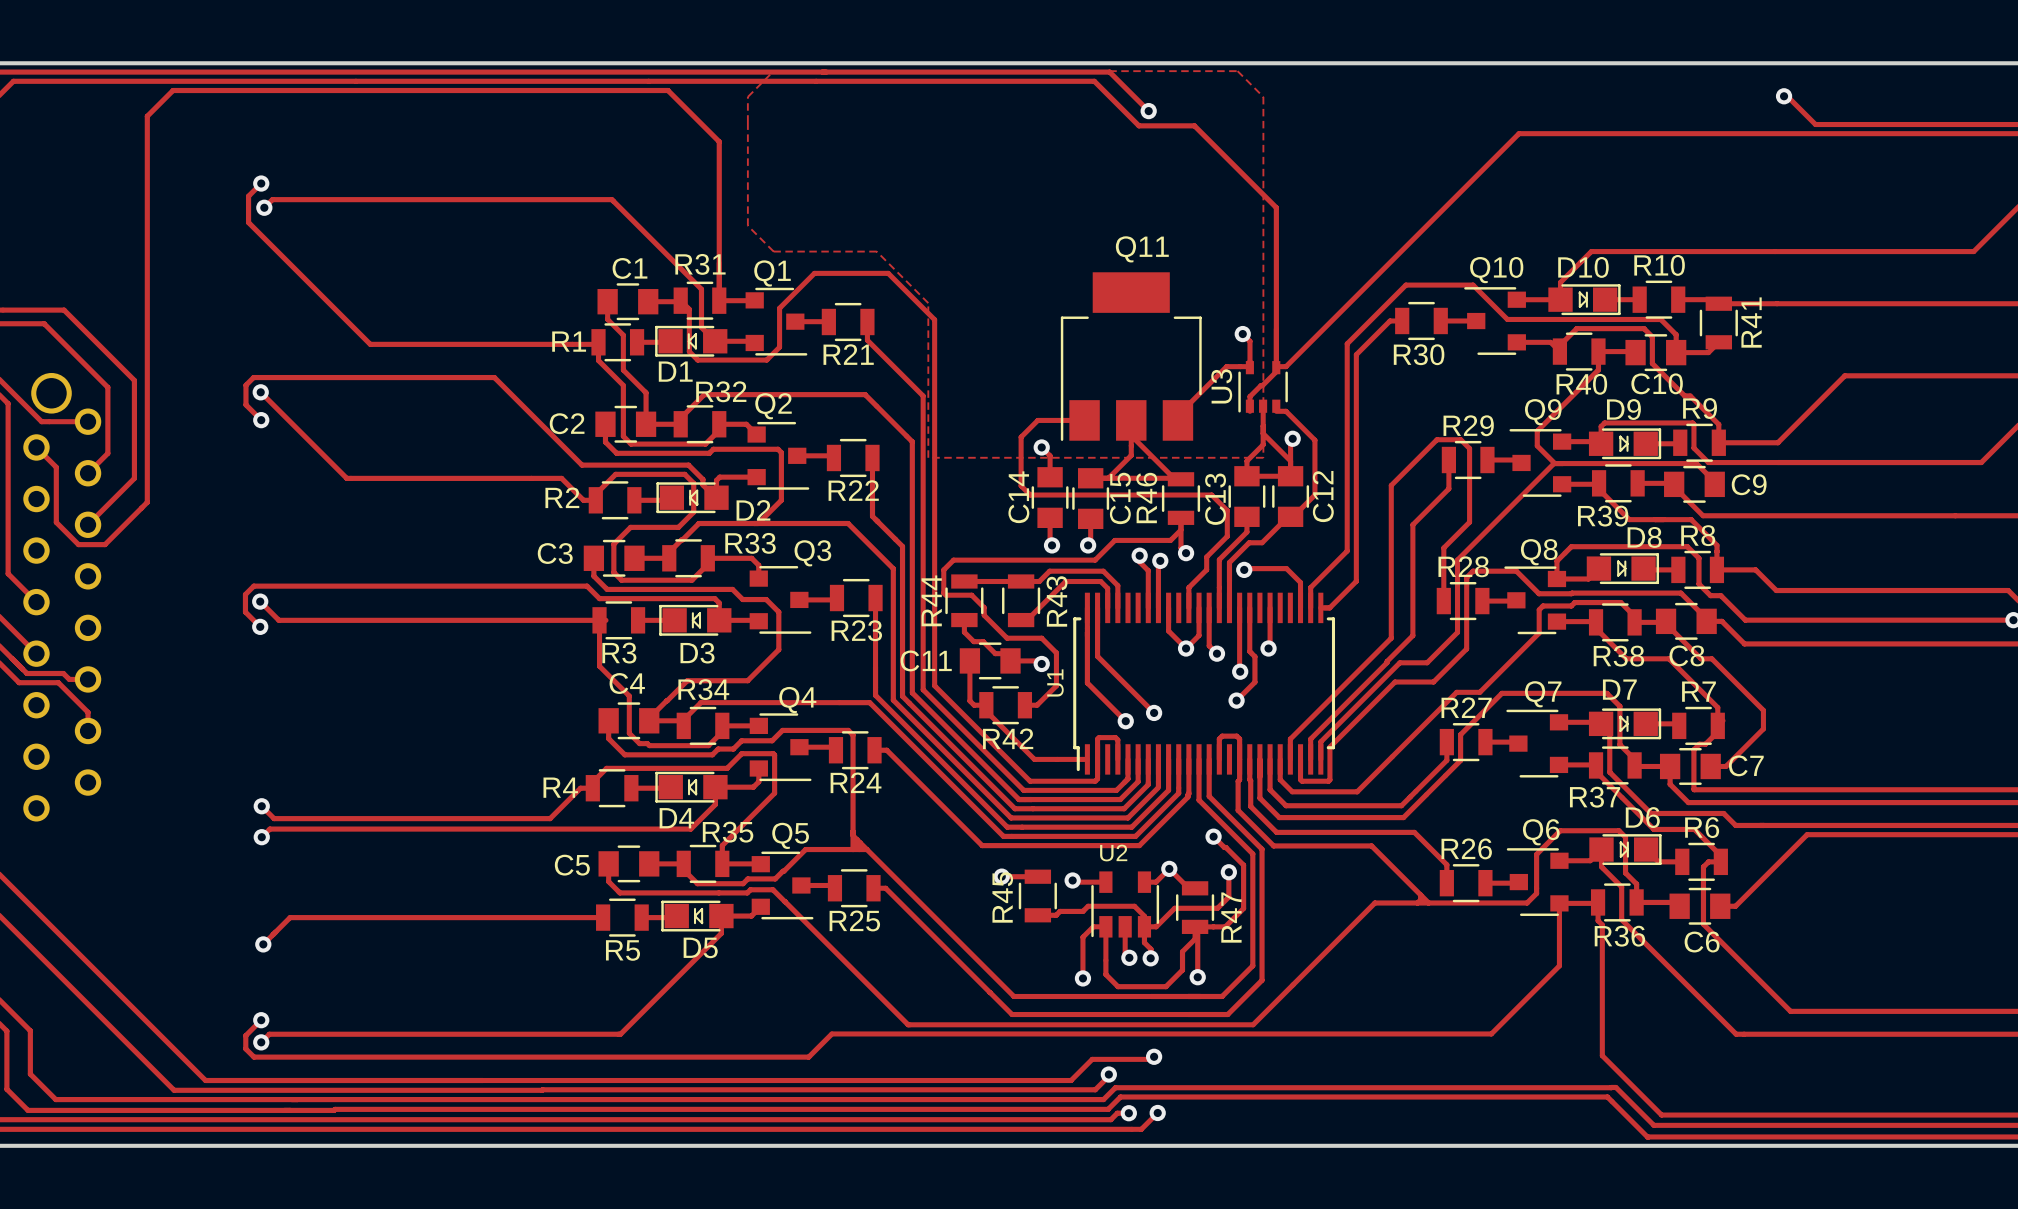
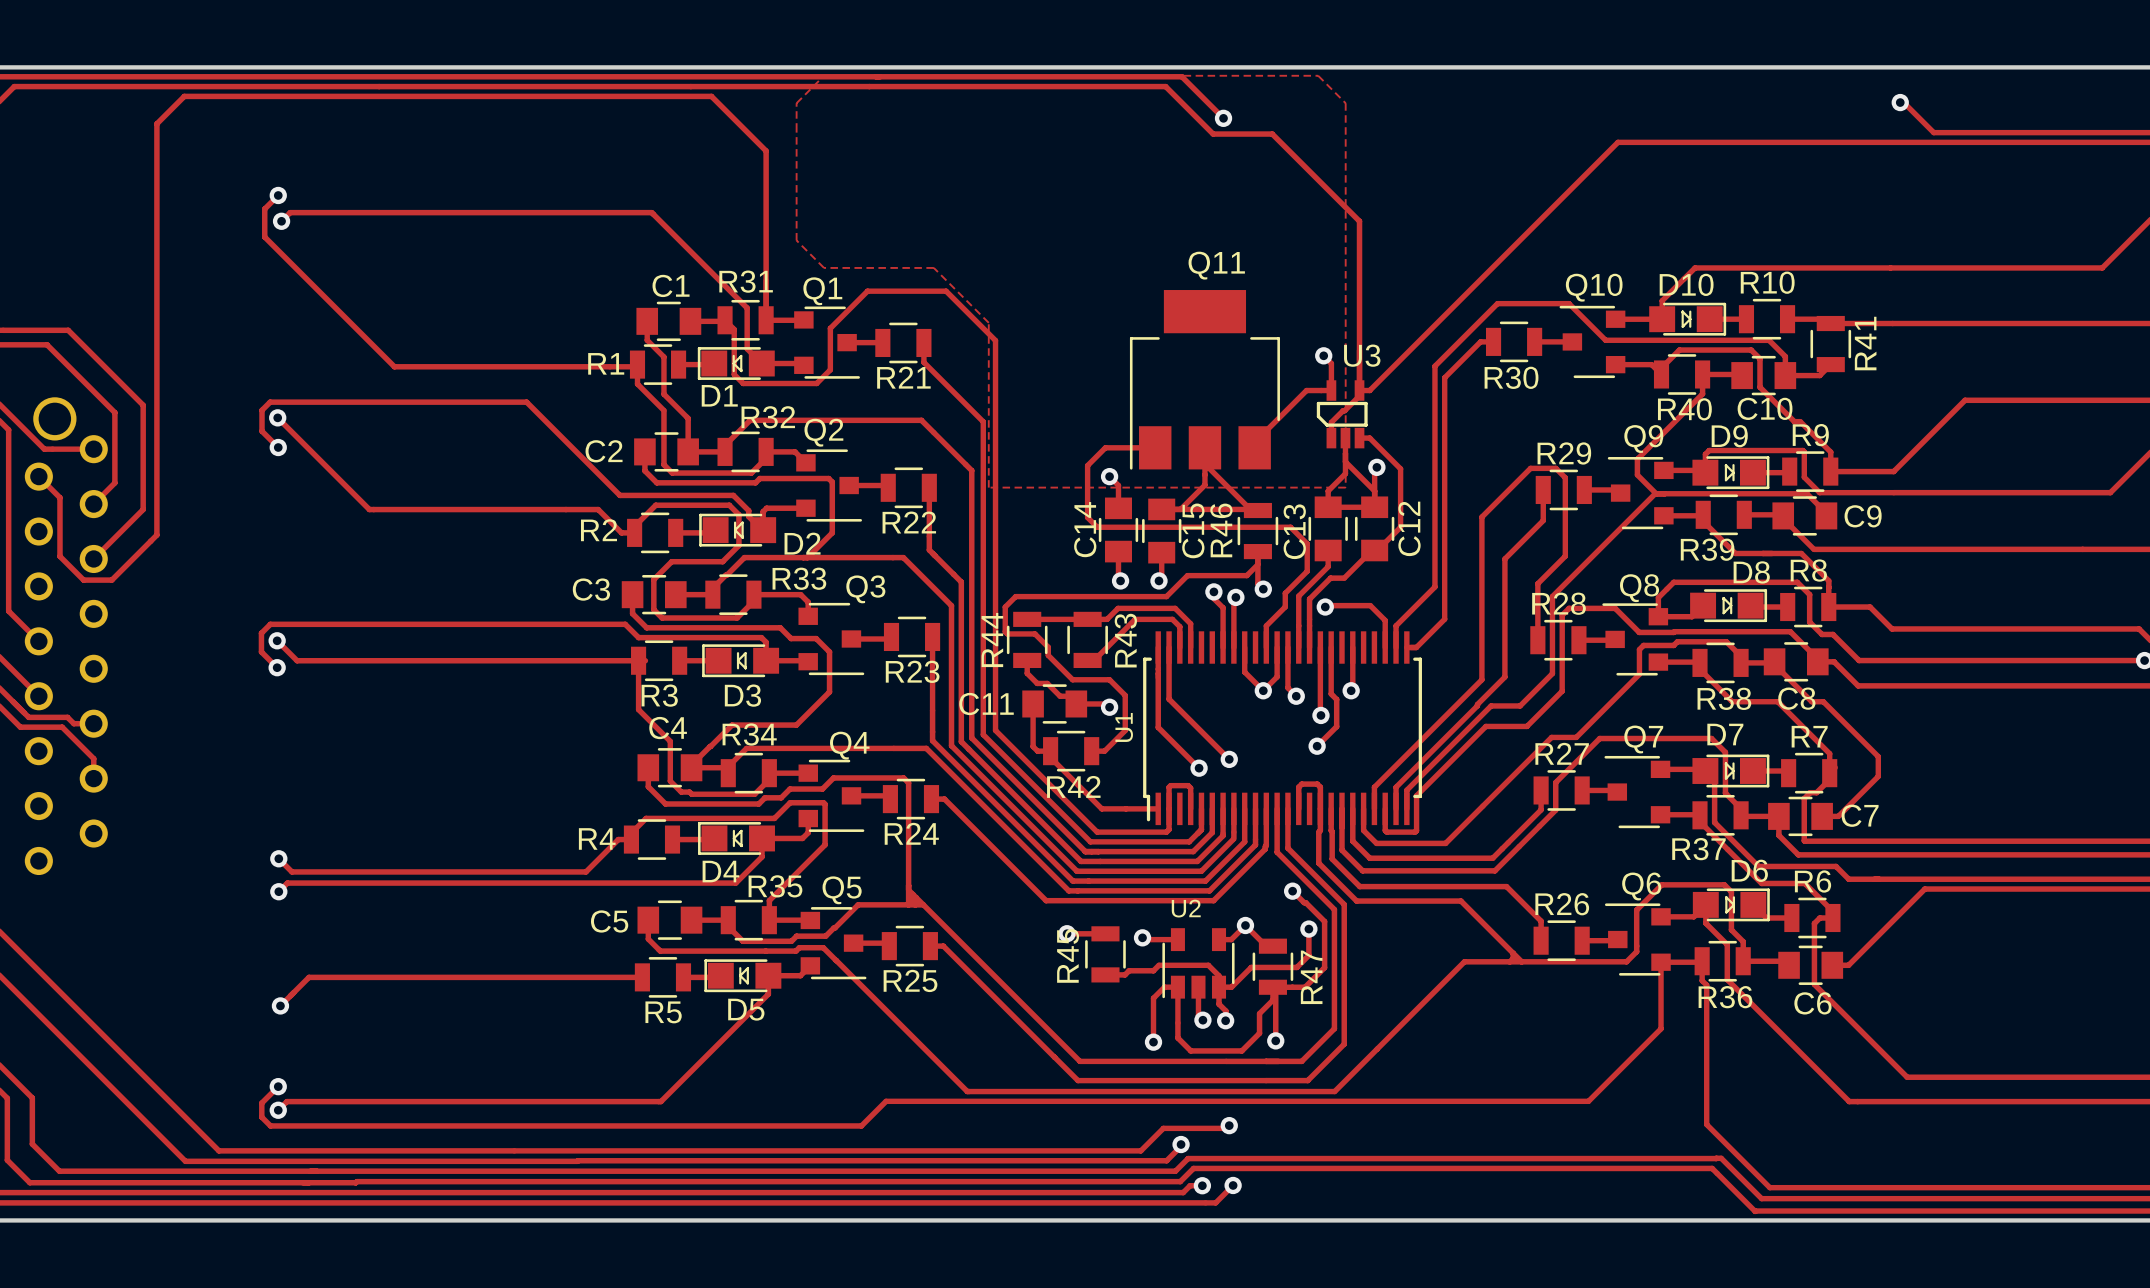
U3 footprint: [1238, 361, 1288, 413] -> [1316, 380, 1368, 449]
U3 name position: U3 (1221, 386) -> U3 (1362, 355)

